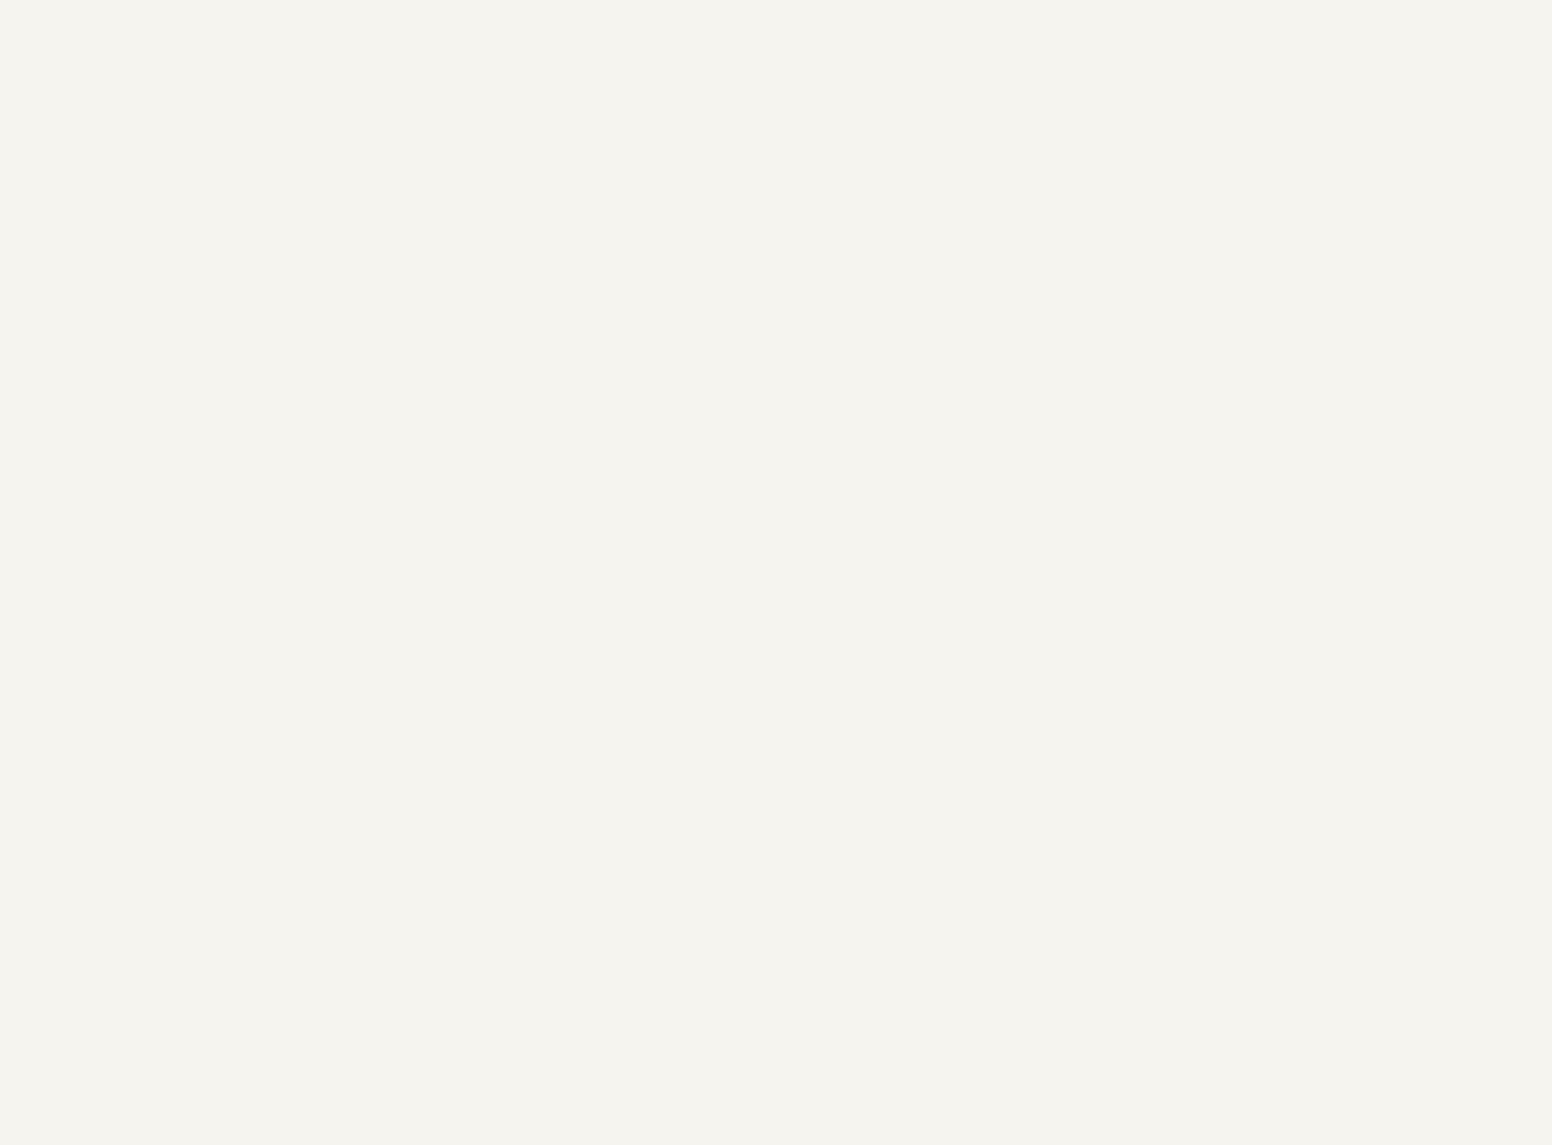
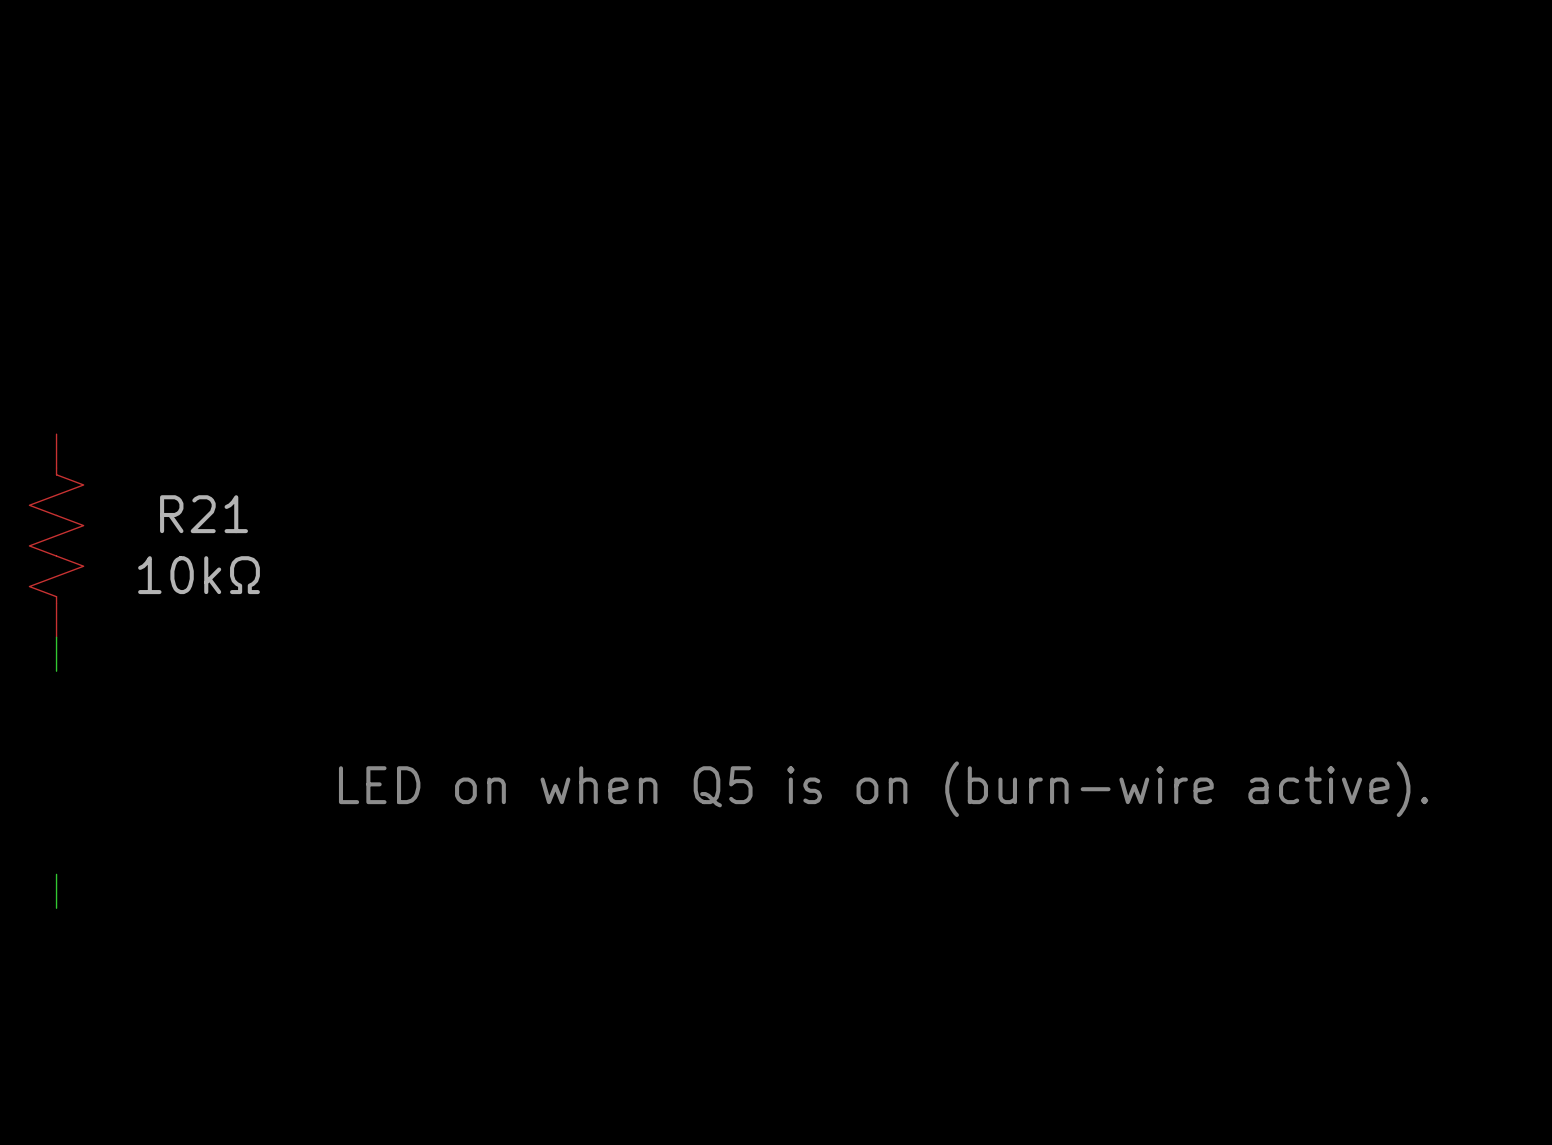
R21: none -> 10kΩ (56, 535)
wire: none -> (56, 637) (56, 671)
text: none -> LED on when Q5 is on (burn-wire active). (883, 789)
wire: none -> (56, 874) (56, 908)

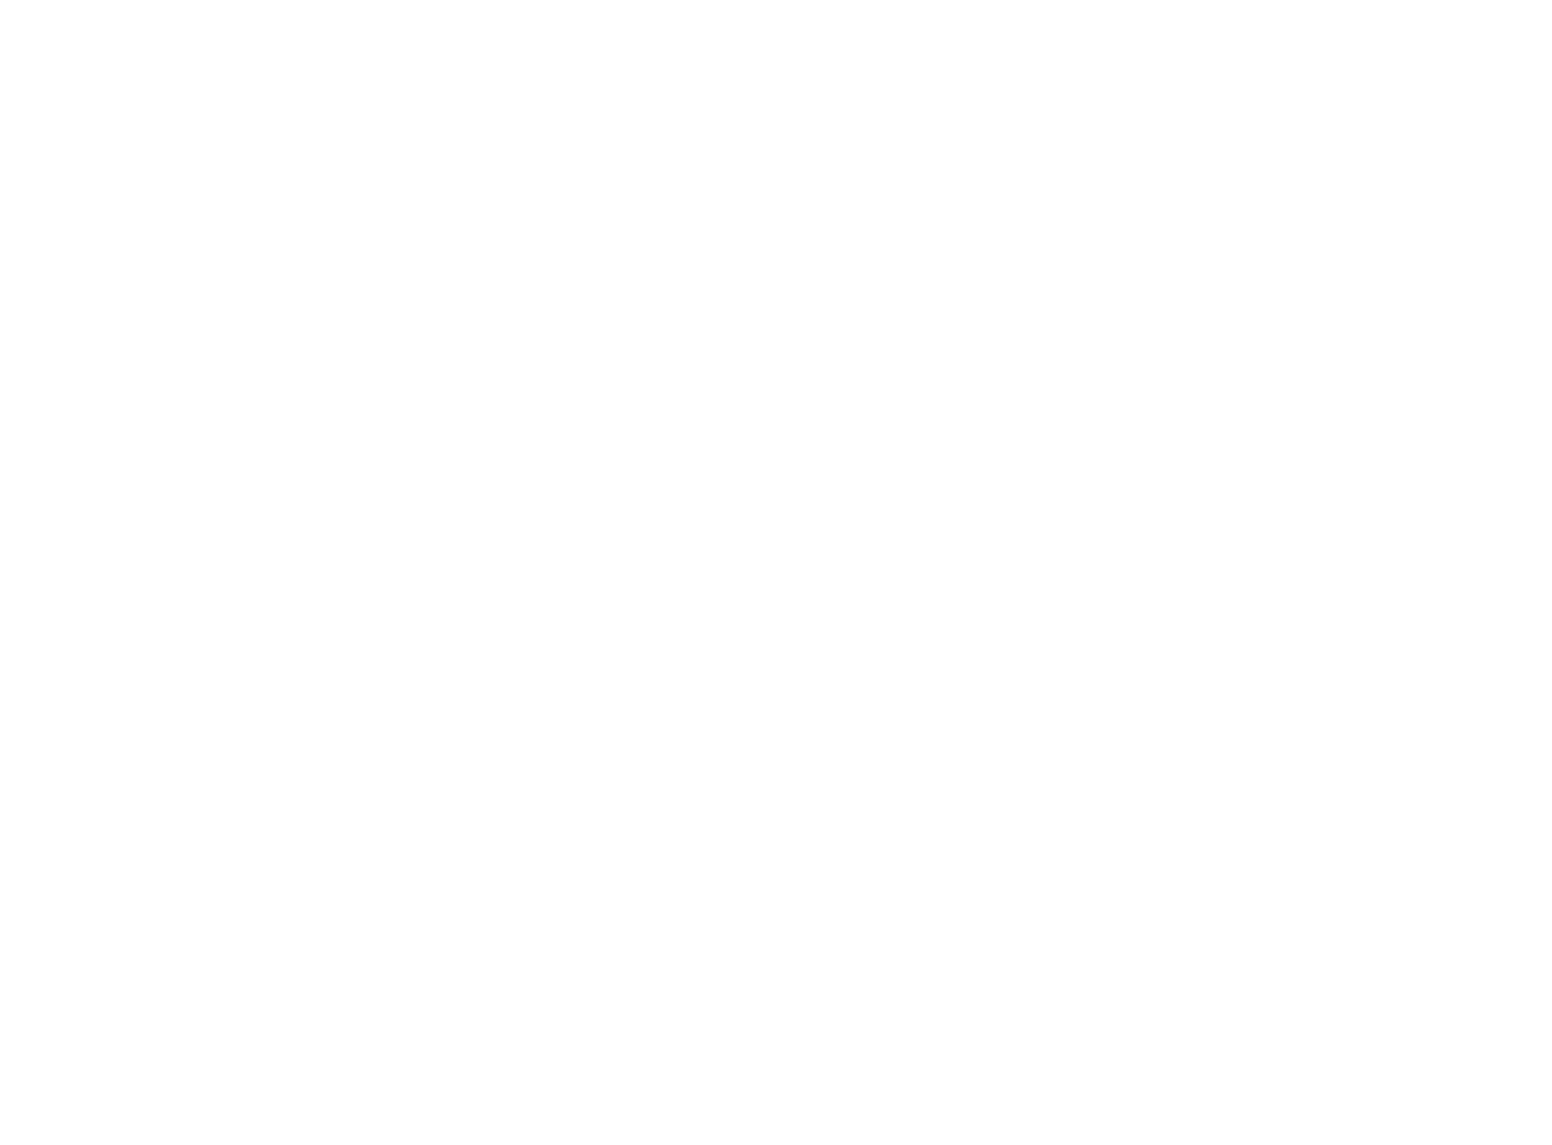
R21: 10kΩ (56, 535) -> none
wire: (56, 637) (56, 671) -> none
text: LED on when Q5 is on (burn-wire active). (883, 789) -> none
wire: (56, 874) (56, 908) -> none

